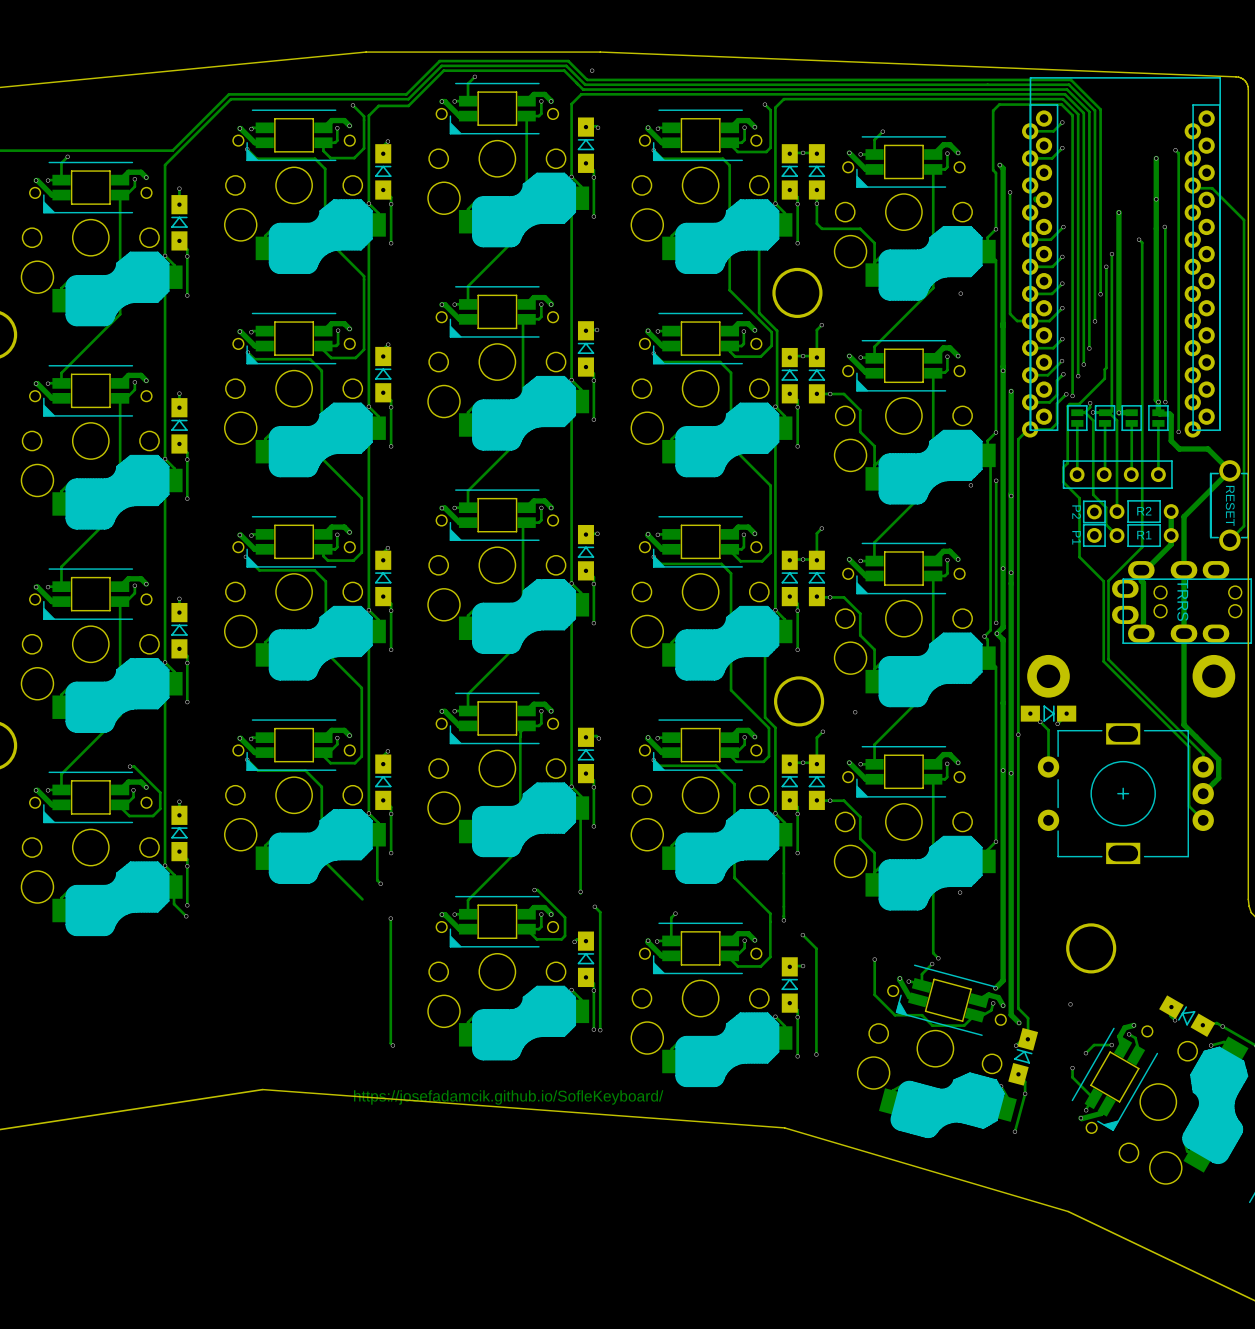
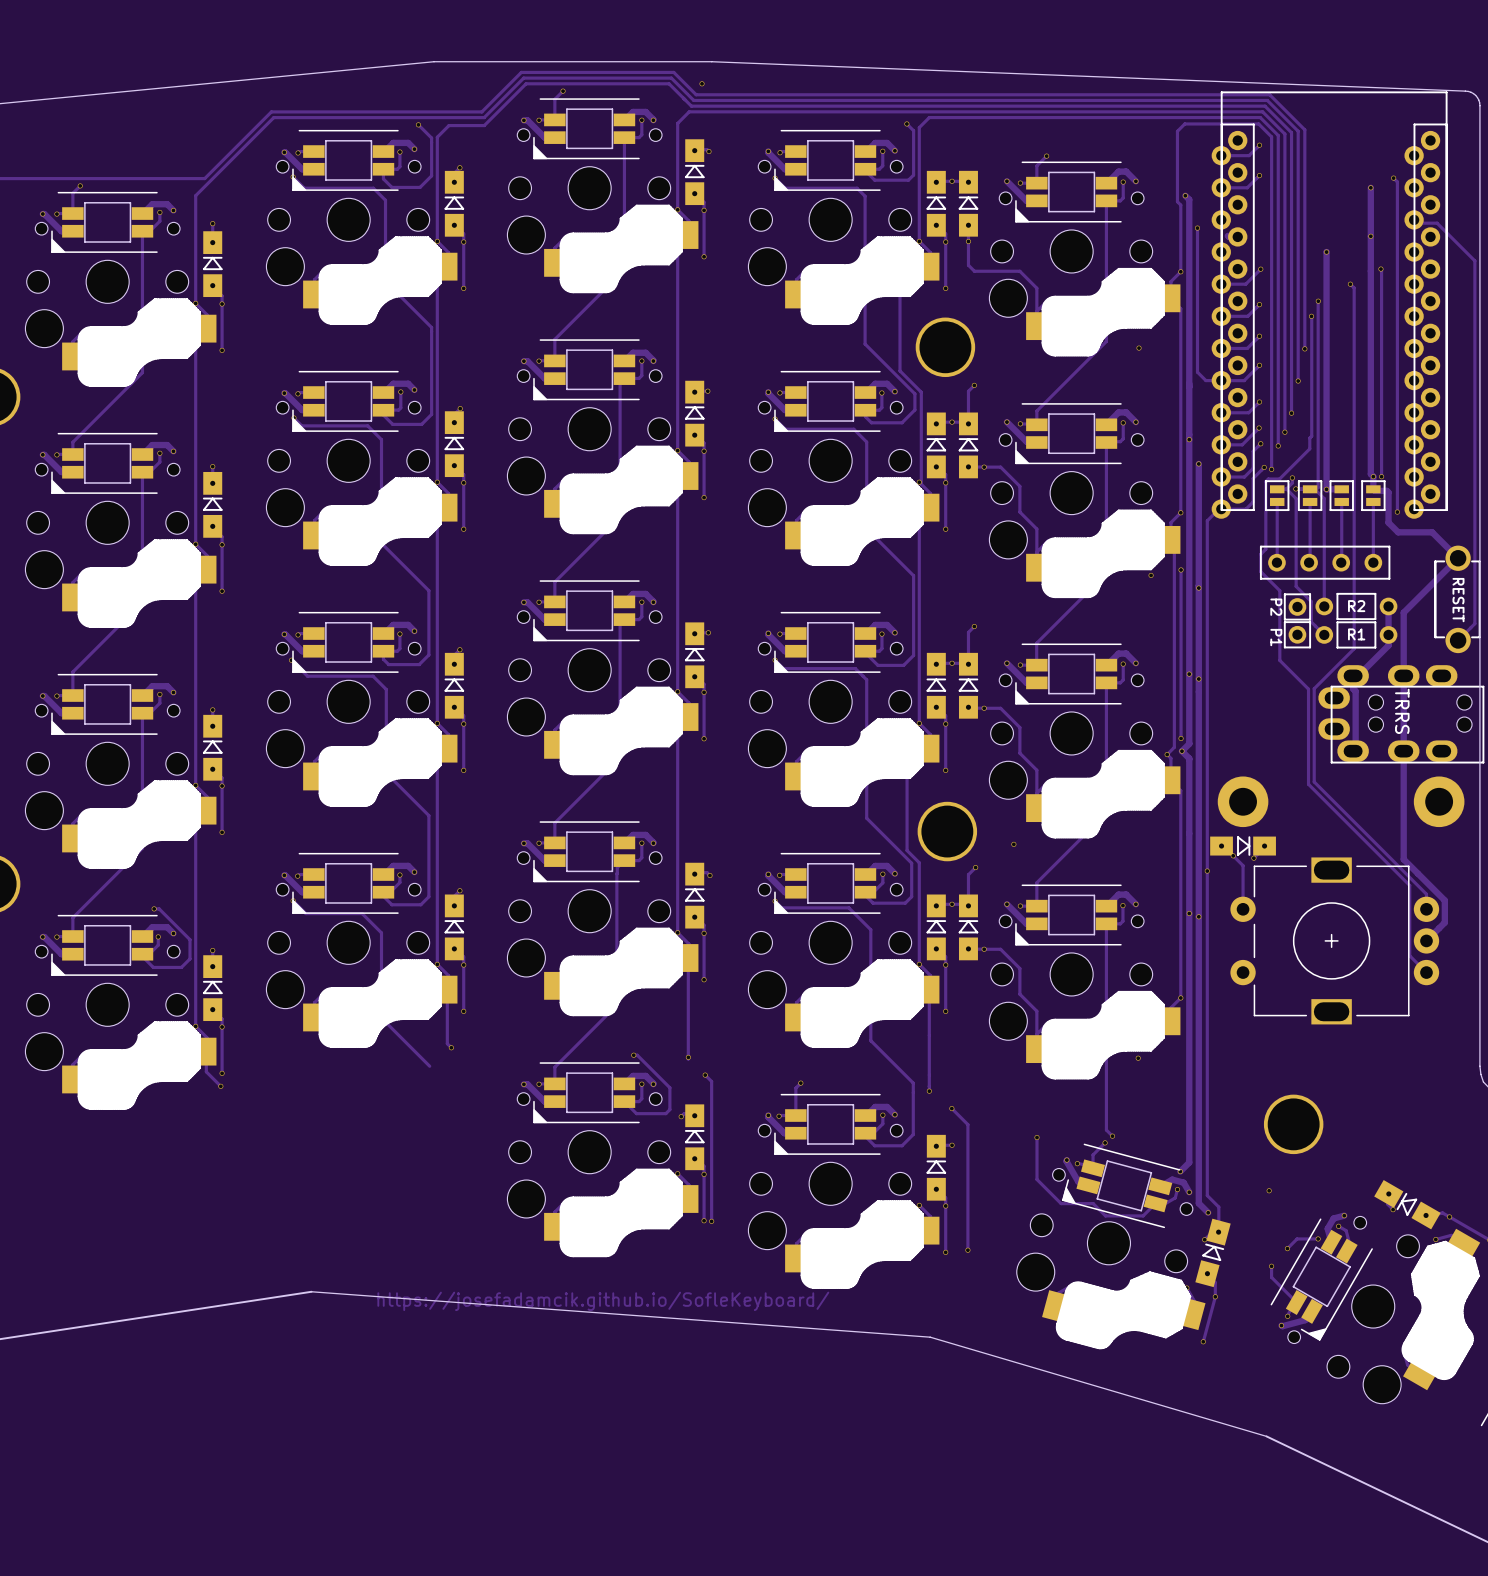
track: (390, 918) (390, 1043) (392, 1045) -> none
via: (390, 918) -> none
via: (392, 1045) -> none

